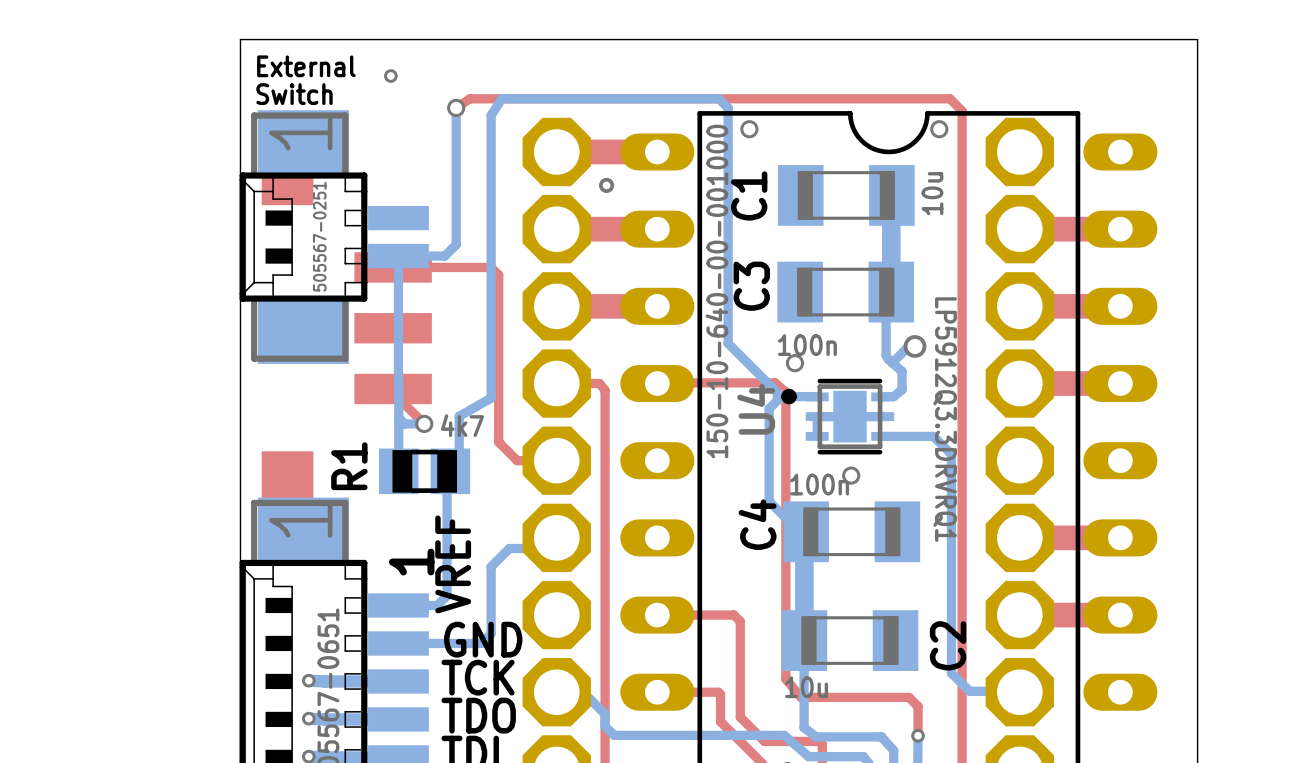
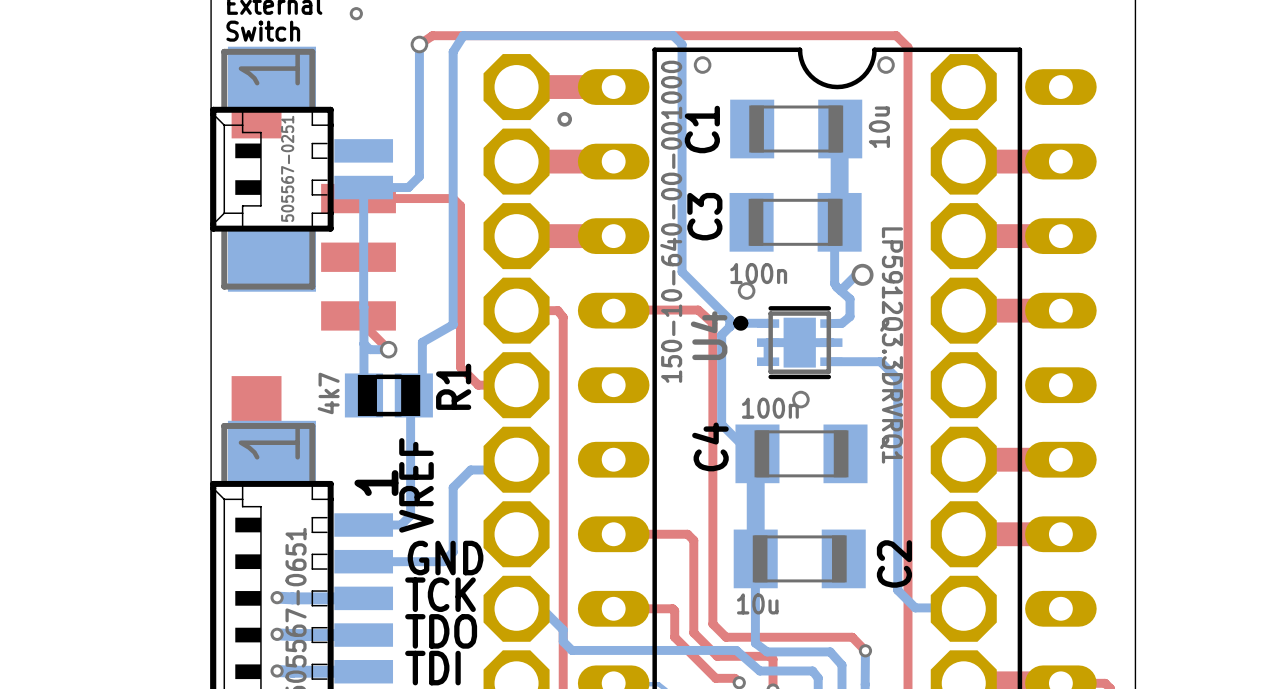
top track: (744, 382) (775, 382) (785, 392) (785, 679) (801, 697) (908, 697) (918, 706) (918, 735) -> (698, 310) (712, 323) (712, 624) (726, 637) (852, 637) (865, 650)
R1 value rotation: 0° (462, 425) -> 90° counterclockwise (328, 393)
R1 value position: 4k7 (462, 425) -> 4k7 (328, 393)
R1 name position: R1 (349, 466) -> R1 (453, 386)

